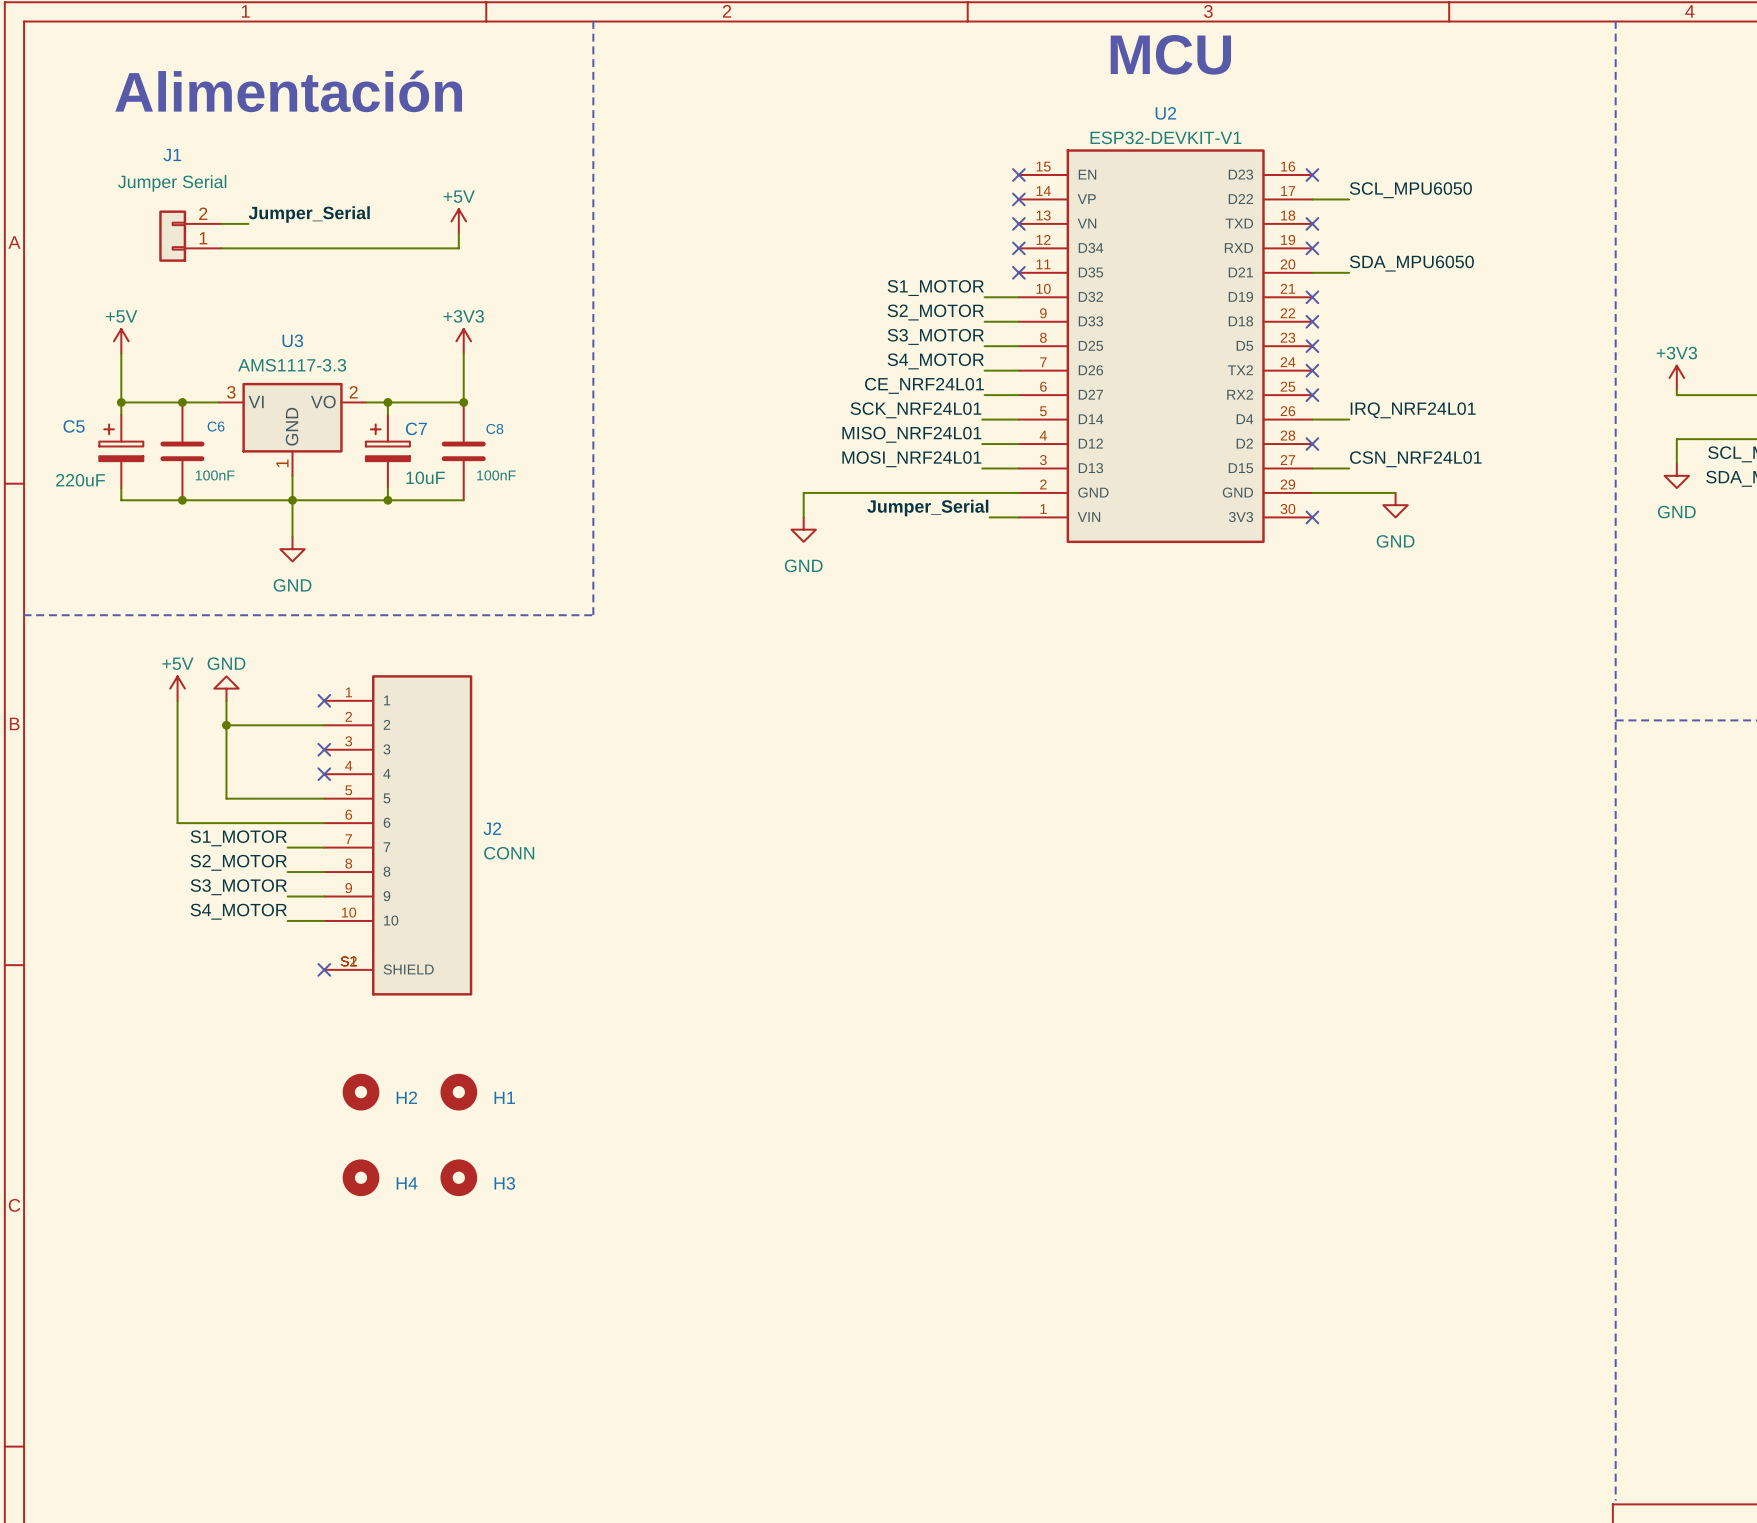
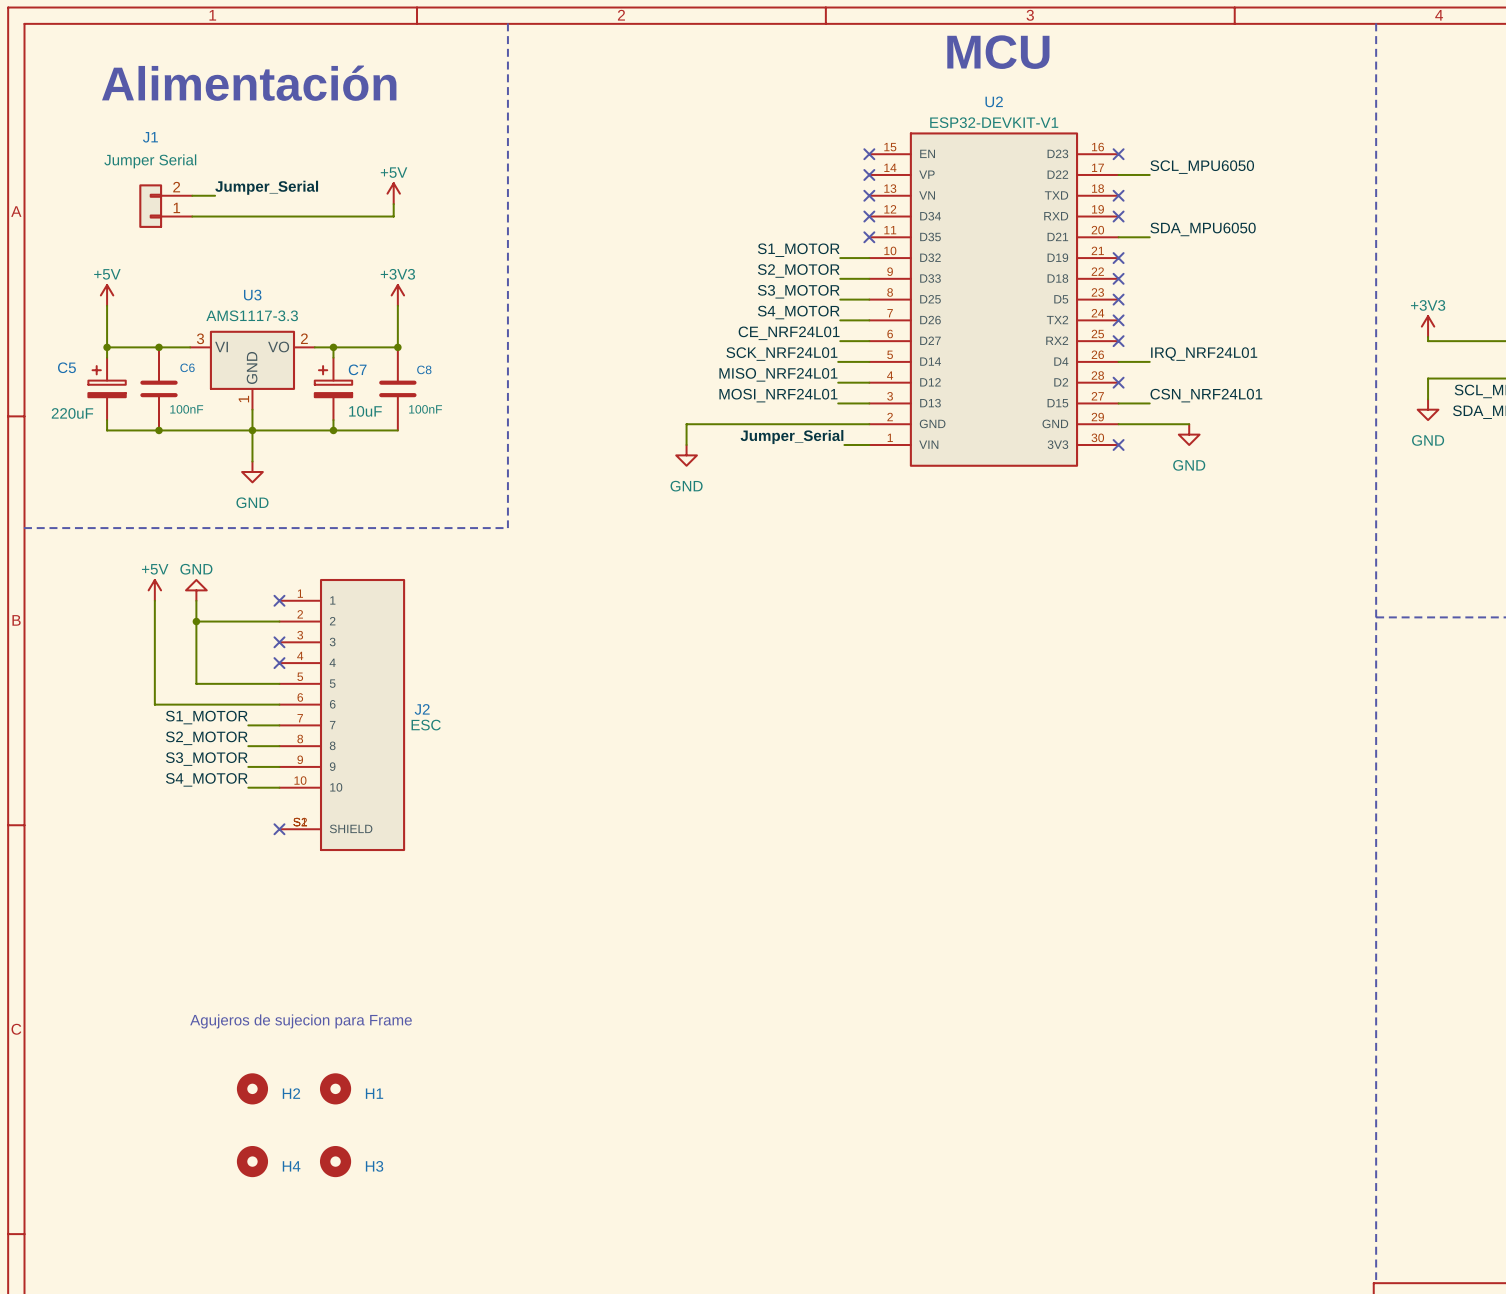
J2 value: CONN (509, 853) -> ESC (426, 725)
H2 position: (360, 1092) -> (252, 1088)
H1 position: (458, 1092) -> (335, 1088)
H4 position: (360, 1177) -> (252, 1161)
H3 position: (458, 1177) -> (335, 1161)
text: none -> Agujeros de sujecion para Frame (301, 1021)

